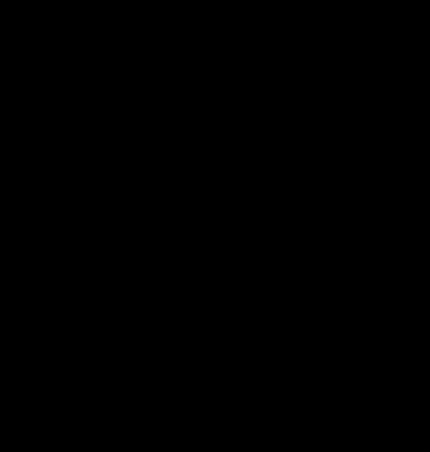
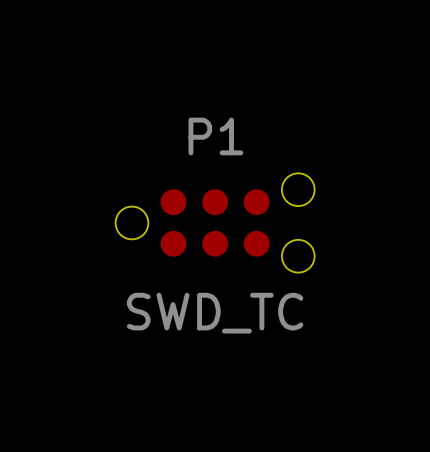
P1: none -> SWD_TC (215, 222)

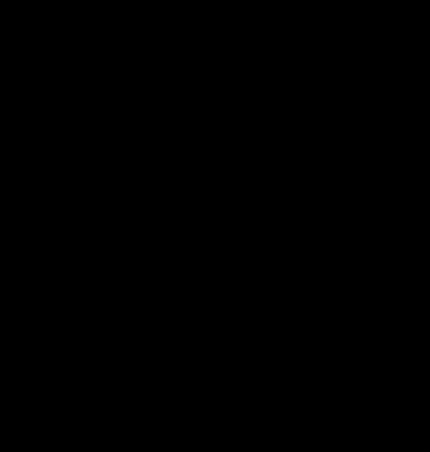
P1: SWD_TC (215, 222) -> none

